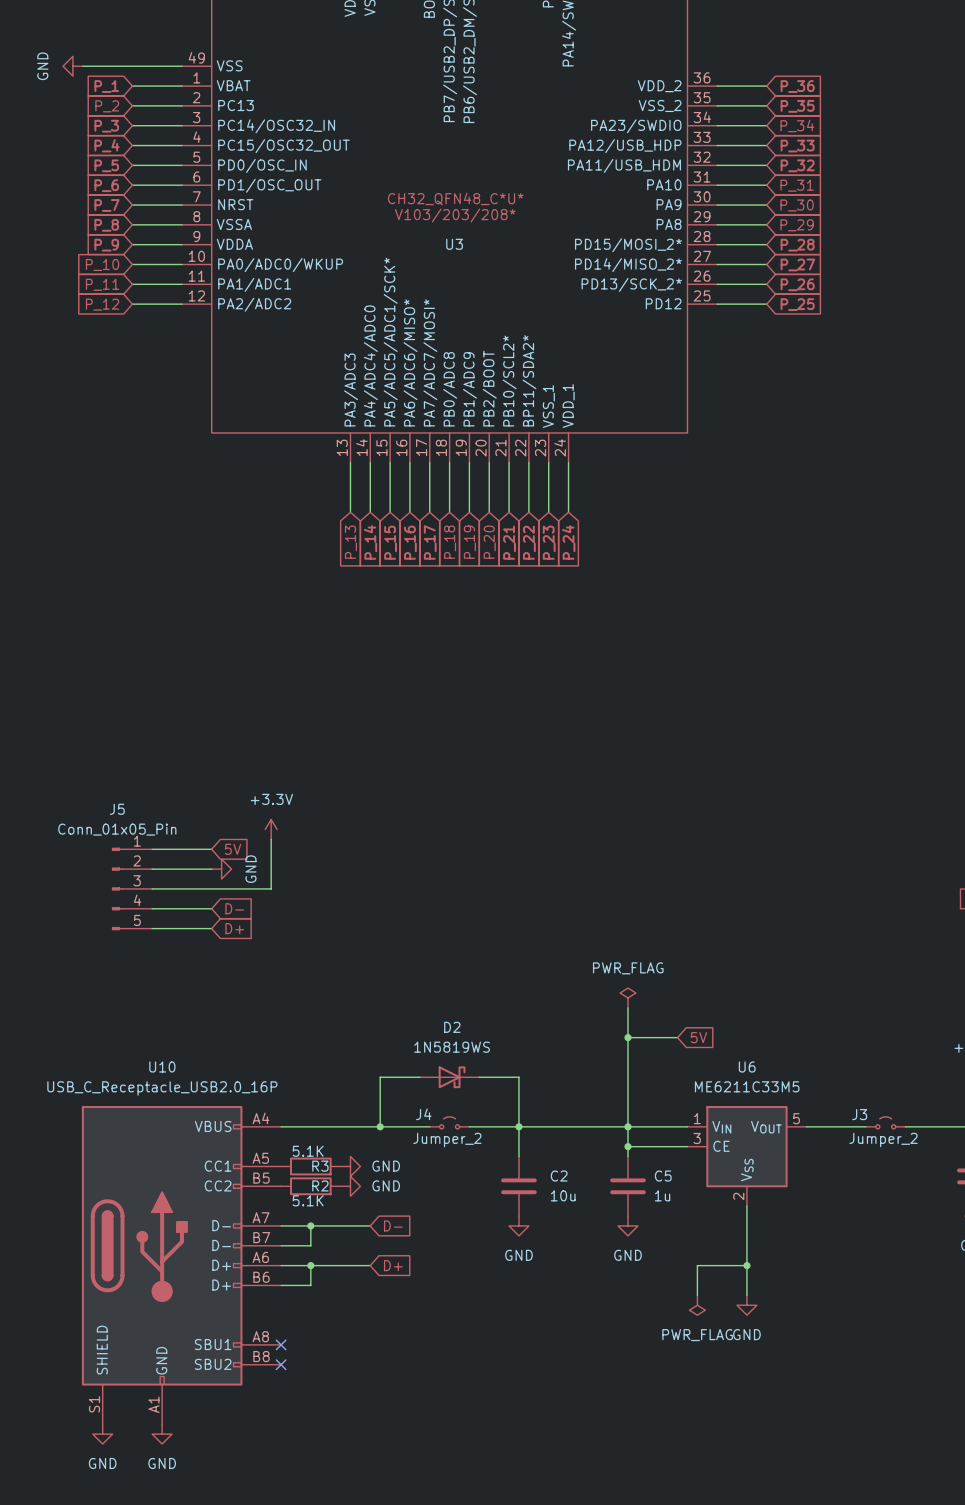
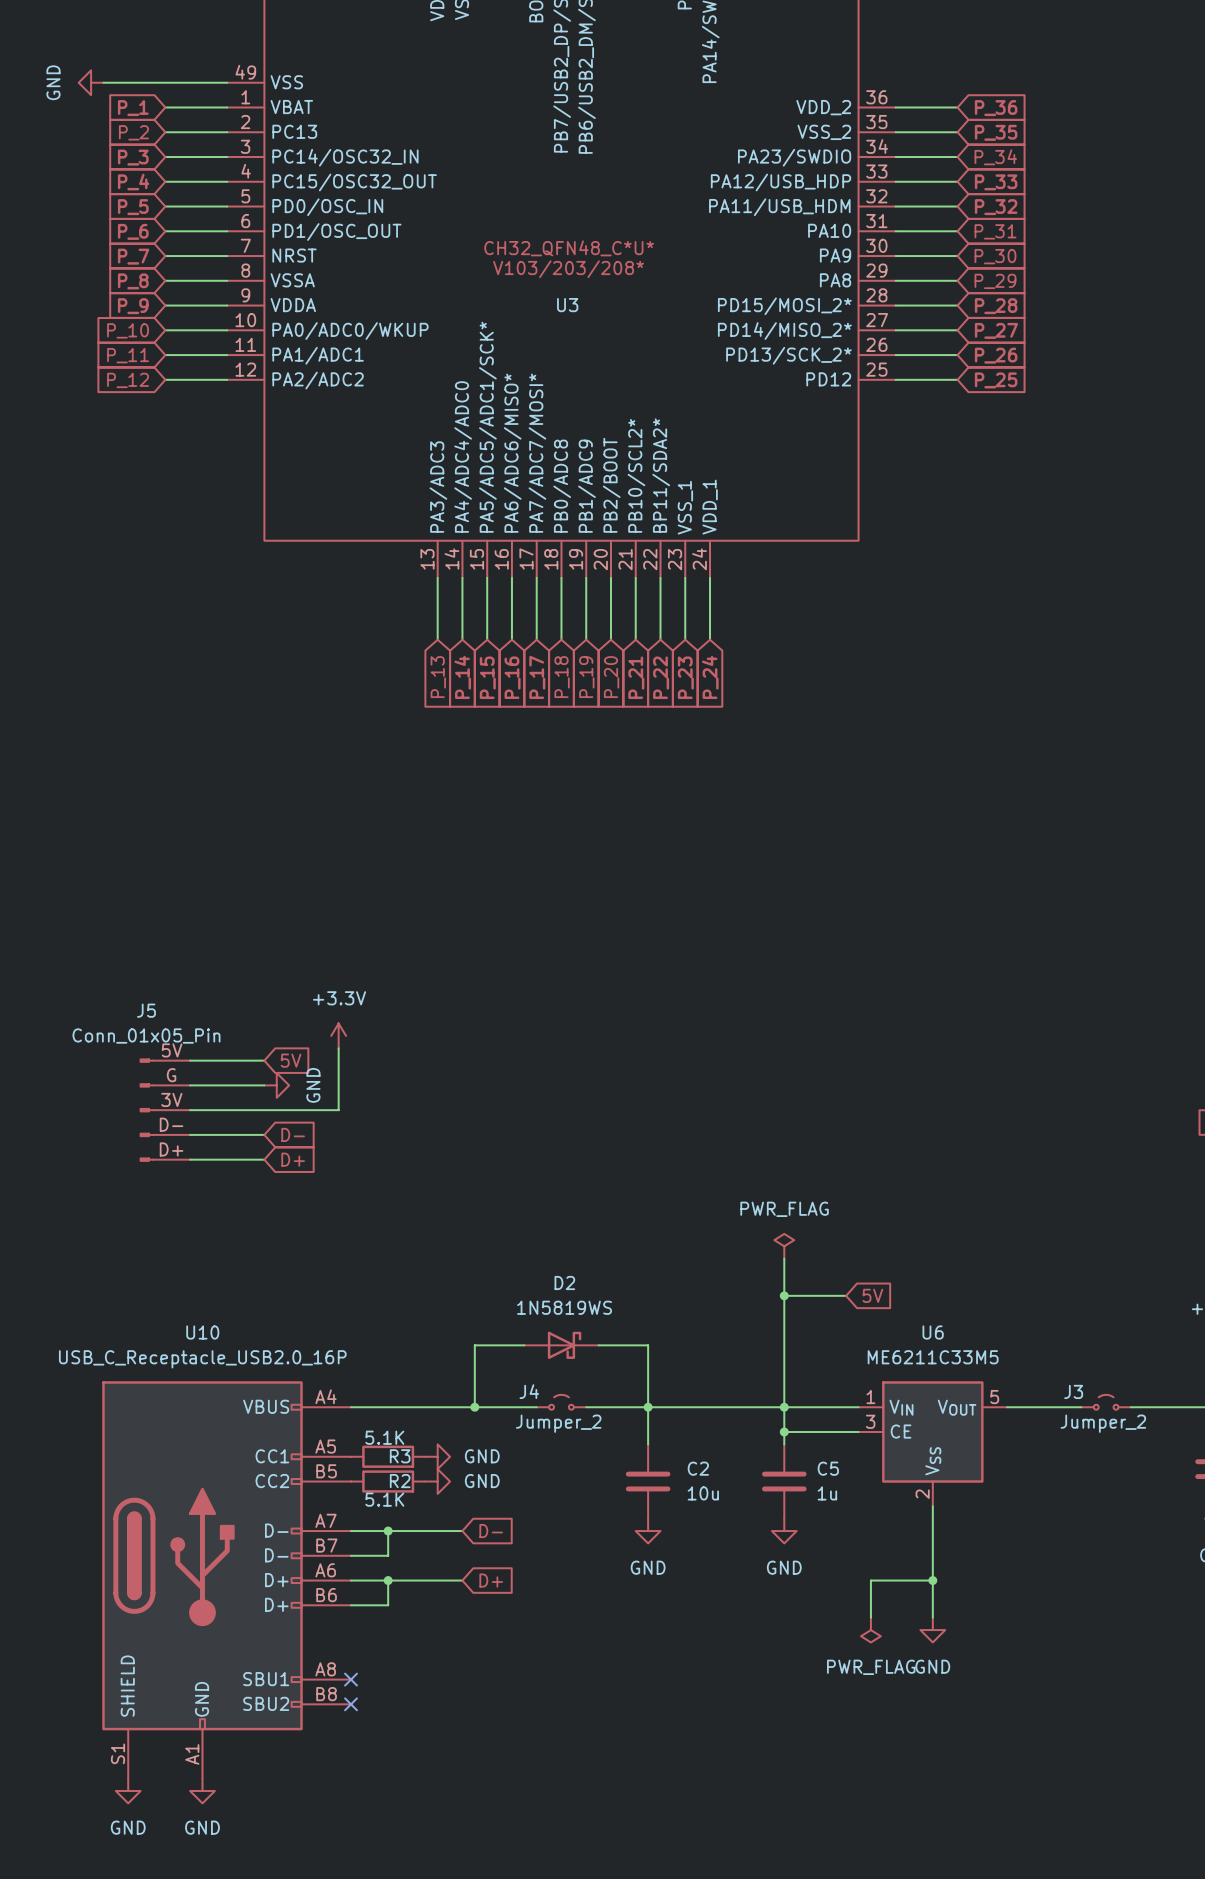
J5 pin number: 1 (137, 841) -> 5V (172, 1050)
J5 pin number: 2 (137, 860) -> G (171, 1075)
J5 pin number: 3 (137, 880) -> 3V (171, 1099)
J5 pin number: 4 (137, 900) -> D- (171, 1124)
J5 pin number: 5 (137, 920) -> D+ (171, 1149)

